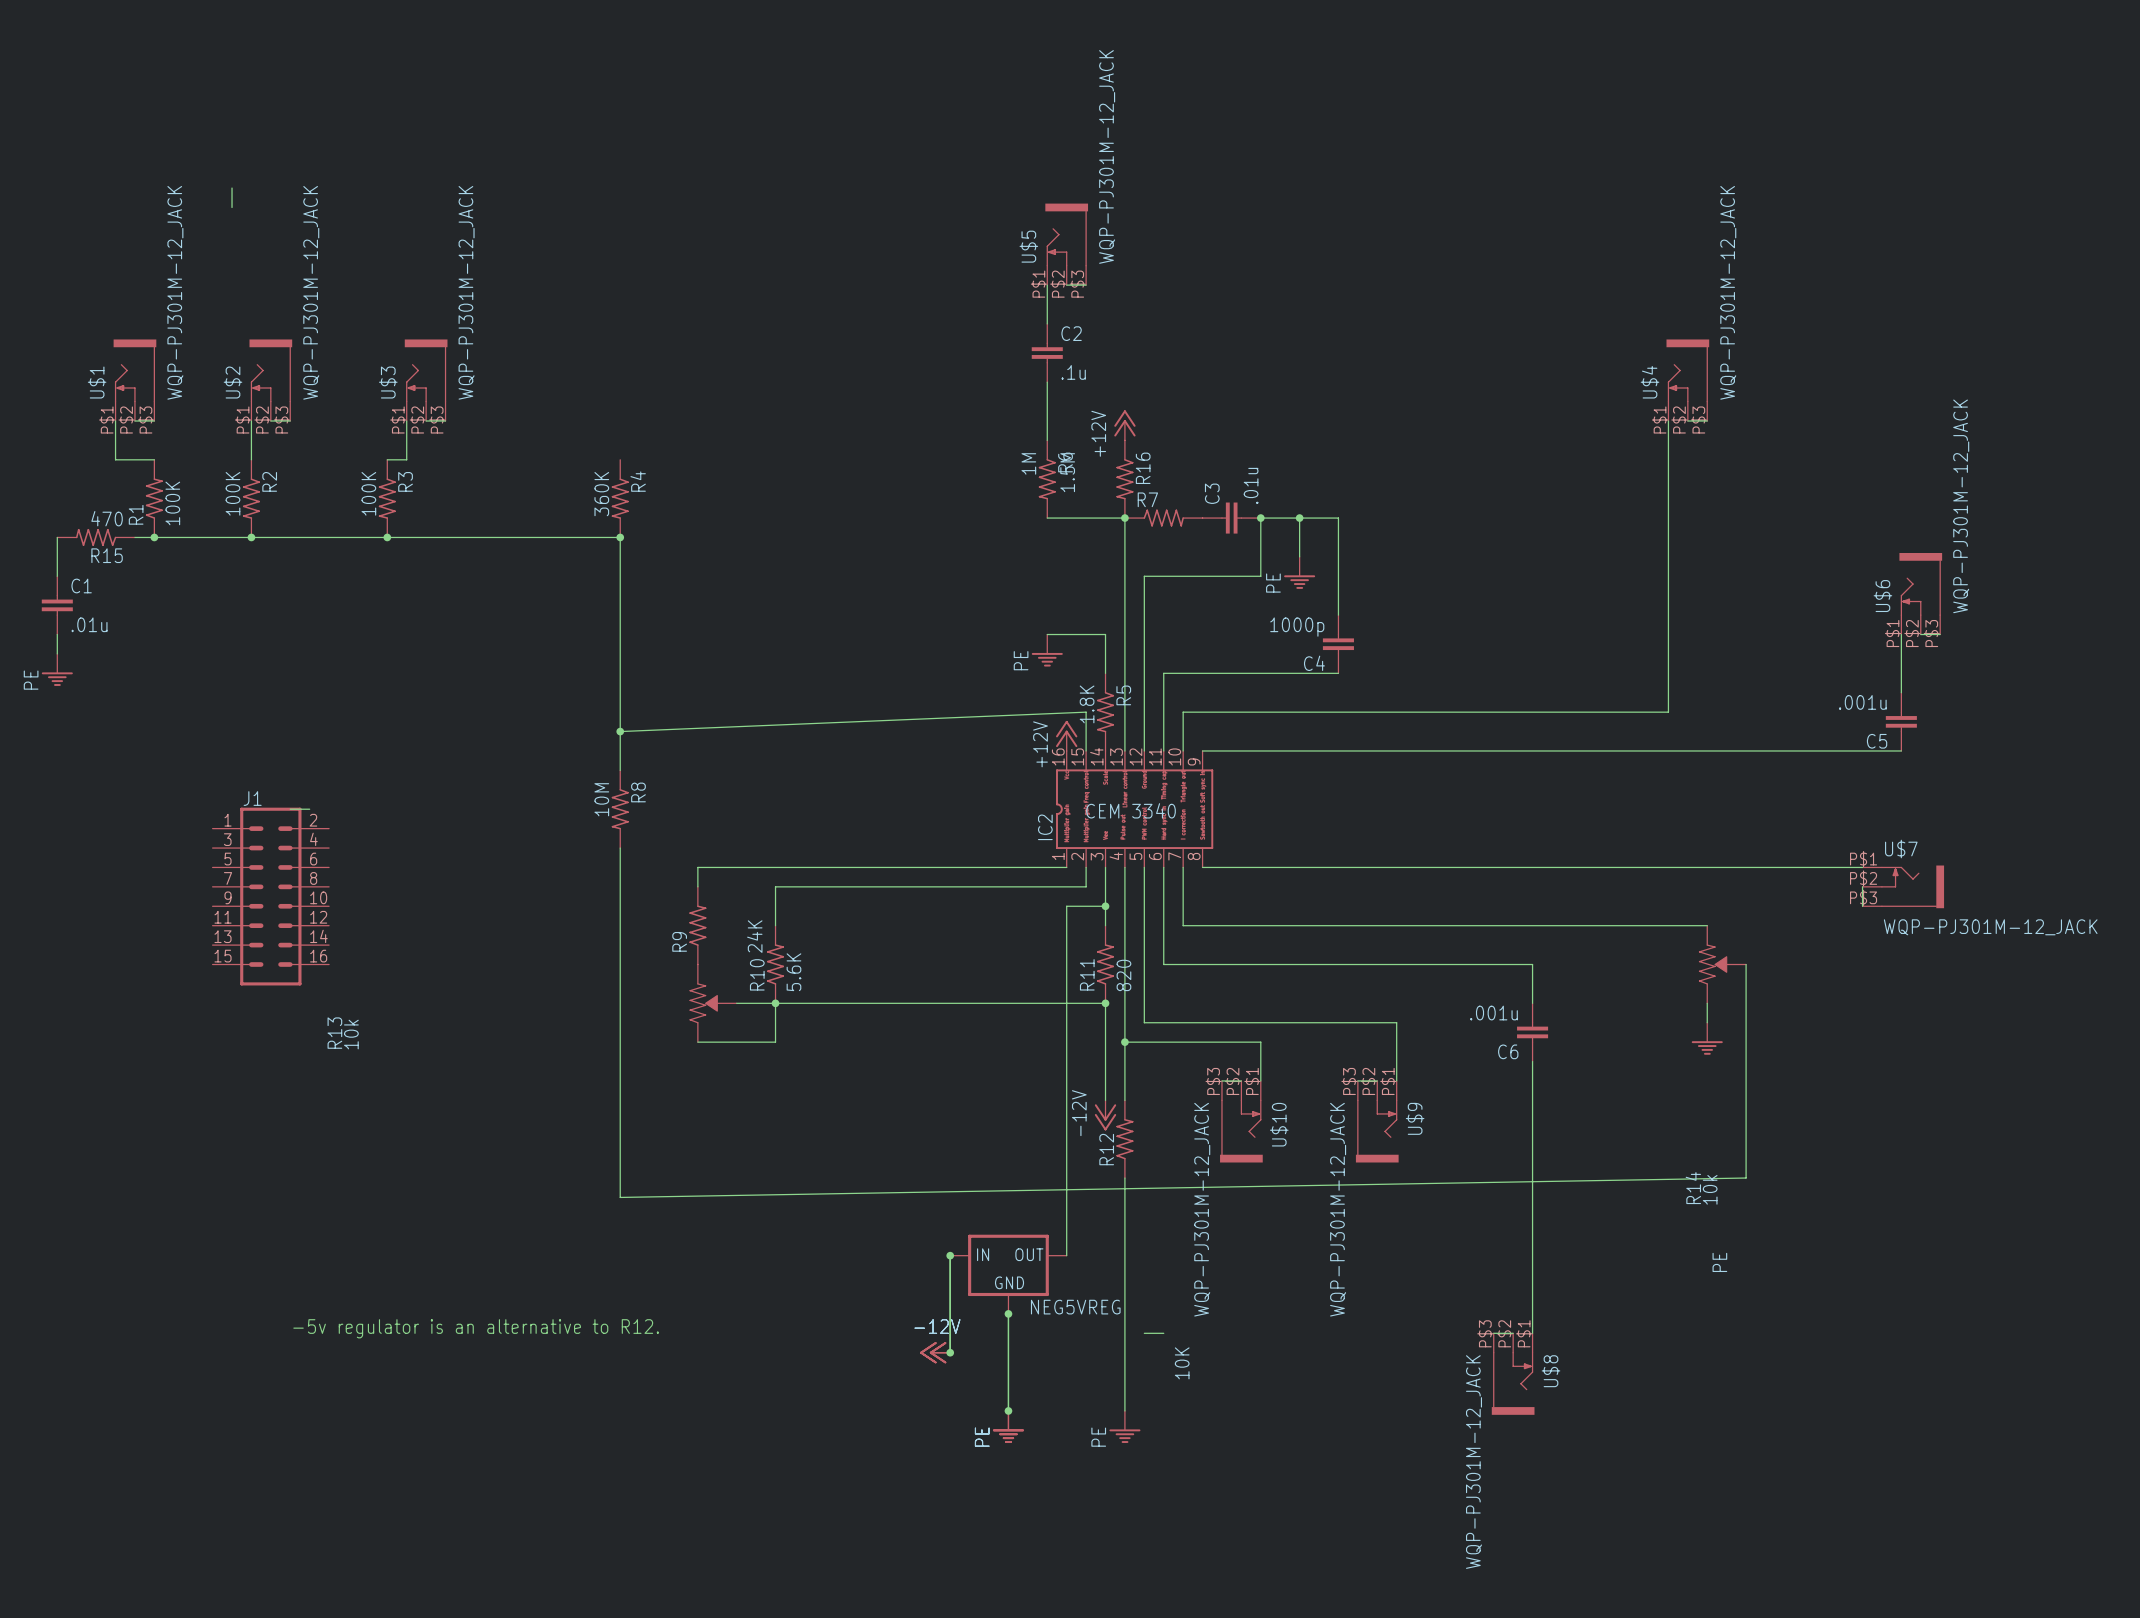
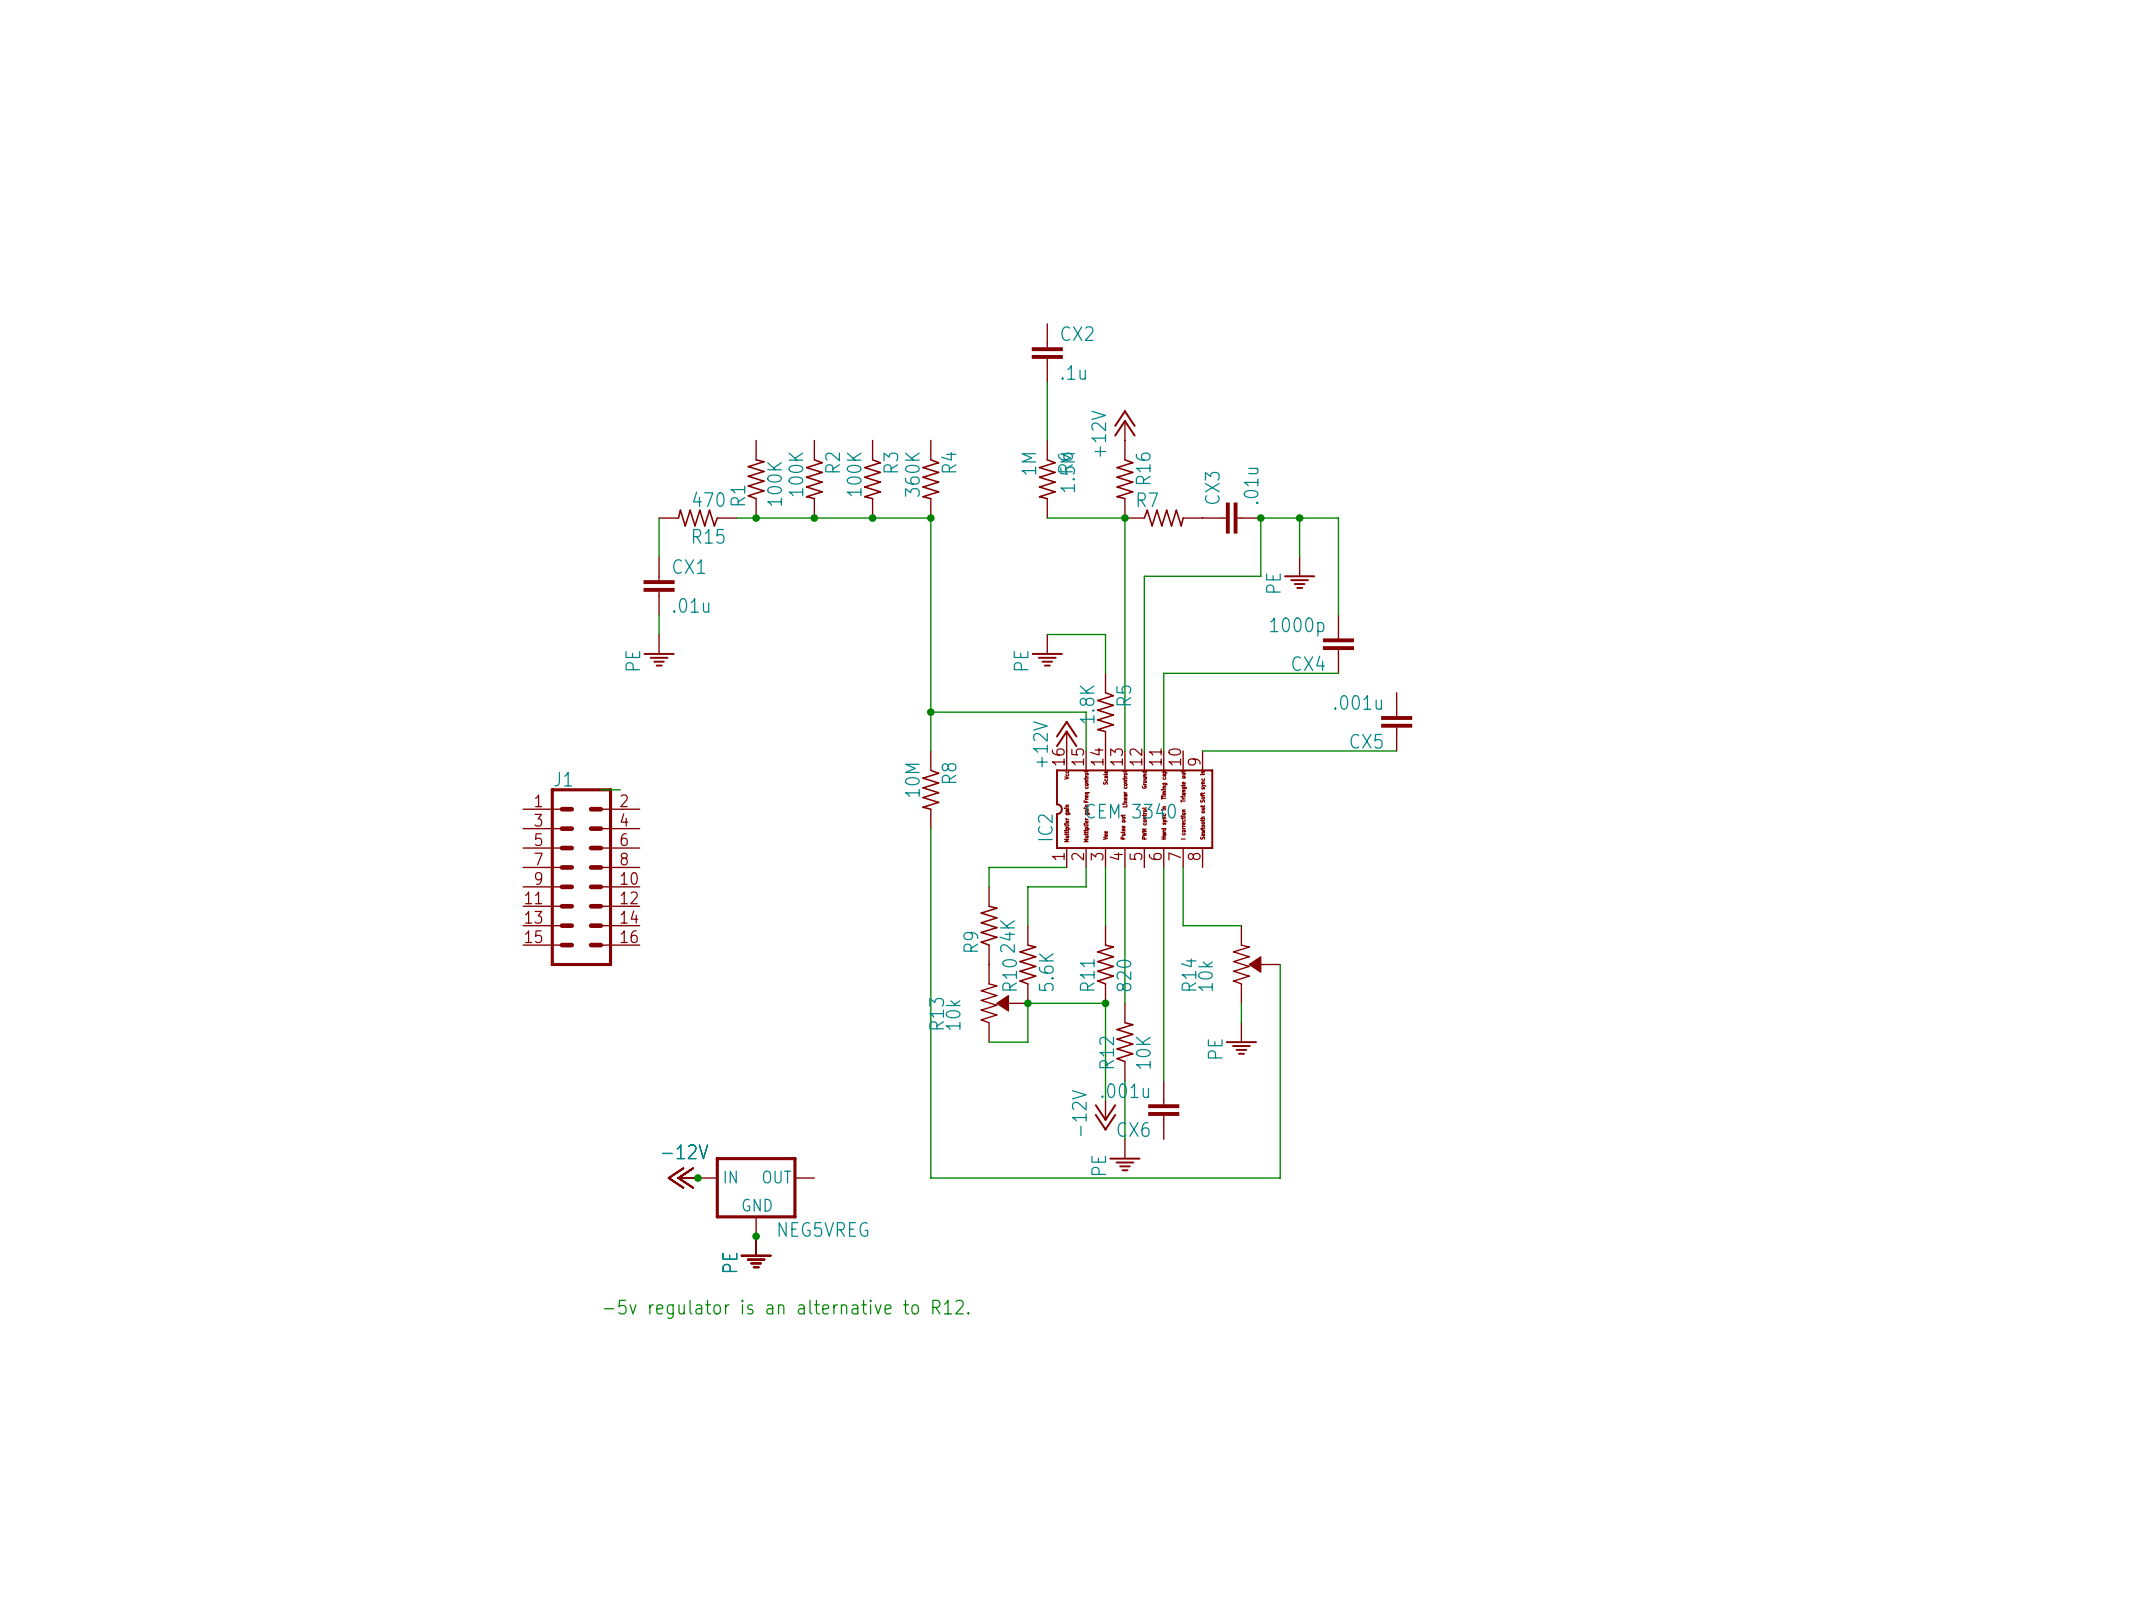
wire: (232, 188) (232, 207) -> none
U$5: WQP-PJ301M-12_JACK (1066, 244) -> none
wire: (1047, 285) (1047, 323) -> none
wire: (1066, 285) (1086, 285) -> none
C2 name: C2 (1071, 333) -> CX2 (1077, 333)
U$1: WQP-PJ301M-12_JACK (134, 380) -> none
U$2: WQP-PJ301M-12_JACK (270, 380) -> none
U$3: WQP-PJ301M-12_JACK (426, 380) -> none
U$4: WQP-PJ301M-12_JACK (1687, 380) -> none
wire: (115, 420) (115, 459) (154, 459) -> none
wire: (134, 420) (154, 420) -> none
wire: (251, 420) (251, 459) -> none
wire: (270, 420) (290, 420) -> none
wire: (406, 420) (406, 459) (387, 459) -> none
wire: (426, 420) (445, 420) -> none
wire: (1668, 420) (1668, 712) (1183, 712) (1183, 750) -> none
wire: (1687, 420) (1707, 420) -> none
C3 name: C3 (1212, 493) -> CX3 (1212, 487)
R1 position: (154, 498) -> (756, 479)
R2 position: (251, 498) -> (814, 479)
R3 position: (387, 498) -> (872, 479)
R4 position: (620, 498) -> (930, 479)
wire: none -> (659, 518) (659, 556)
wire: none -> (736, 518) (930, 518) (930, 750)
junction: none -> (756, 518)
junction: none -> (814, 518)
junction: none -> (872, 518)
junction: none -> (930, 518)
wire: (57, 537) (57, 576) -> none
R15 position: (96, 537) -> (697, 518)
wire: (134, 537) (620, 537) (620, 770) -> none
junction: (154, 537) -> none
junction: (251, 537) -> none
junction: (387, 537) -> none
junction: (620, 537) -> none
CX1: none -> .01u (659, 585)
U$6: WQP-PJ301M-12_JACK (1920, 593) -> none
C1: .01u (57, 605) -> none
wire: none -> (659, 615) (659, 634)
wire: (57, 634) (57, 653) -> none
wire: (1901, 634) (1901, 692) -> none
wire: (1920, 634) (1940, 634) -> none
power symbol: none -> PE (659, 650)
C4 name: C4 (1314, 663) -> CX4 (1308, 663)
power symbol: PE (57, 669) -> none
junction: none -> (930, 712)
wire: (1086, 712) (620, 731) -> (1086, 712) (930, 712)
CX5: none -> .001u (1396, 721)
C5: .001u (1901, 721) -> none
junction: (620, 731) -> none
wire: (1396, 750) (1901, 750) -> none
wire: none -> (600, 789) (620, 789)
wire: (290, 809) (309, 809) -> none
R8 position: (620, 809) -> (930, 789)
wire: none -> (930, 828) (930, 1178) (1280, 1178) (1280, 964)
wire: (620, 848) (620, 1197) (1746, 1178) (1746, 964) -> none
wire: (989, 867) (697, 867) (697, 886) -> (989, 867) (989, 886)
wire: (1144, 867) (1144, 1022) (1396, 1022) (1396, 1080) -> none
wire: (1202, 867) (1862, 867) -> none
wire: (1027, 886) (775, 886) (775, 925) -> (1027, 886) (1027, 925)
wire: (1862, 886) (1862, 906) -> none
U$7: WQP-PJ301M-12_JACK (1903, 886) -> none
J1 position: (270, 896) -> (581, 877)
wire: (1105, 906) (1066, 906) (1066, 1255) -> none
junction: (1105, 906) -> none
R9 position: (697, 925) -> (989, 925)
wire: (1241, 925) (1707, 925) -> none
R9 value position: 24K (754, 936) -> 24K (1007, 936)
R10 position: (775, 964) -> (1027, 964)
wire: (1163, 964) (1532, 964) (1532, 1003) -> (1163, 964) (1163, 1080)
R14 position: (1722, 964) -> (1256, 964)
R13 position: (713, 1003) -> (1004, 1003)
wire: (736, 1003) (1027, 1003) -> (989, 1042) (1027, 1042) (1027, 1003)
wire: (775, 1003) (775, 1042) (697, 1042) -> none
junction: (775, 1003) -> none
junction: none -> (1027, 1003)
wire: none -> (1241, 1003) (1241, 1022)
wire: (1707, 1003) (1707, 1022) -> none
C6: .001u (1532, 1032) -> none
R13 name position: R13 (334, 1033) -> R13 (936, 1013)
R13 value position: 10k (351, 1034) -> 10k (953, 1015)
power symbol: none -> PE (1241, 1038)
power symbol: PE (1707, 1038) -> none
wire: (1124, 1042) (1260, 1042) (1260, 1080) -> none
junction: (1124, 1042) -> none
wire: (1532, 1061) (1532, 1333) -> none
wire: (1221, 1080) (1241, 1080) -> none
wire: (1357, 1080) (1377, 1080) -> none
CX6: none -> .001u (1163, 1110)
U$10: WQP-PJ301M-12_JACK (1241, 1121) -> none
U$9: WQP-PJ301M-12_JACK (1377, 1121) -> none
R12 position: (1124, 1139) -> (1124, 1042)
power symbol: none -> PE (1124, 1155)
power symbol: none -> -12V (682, 1178)
junction: none -> (697, 1178)
wire: (1124, 1178) (1124, 1410) -> none
R14 name position: R14 (1693, 1188) -> R14 (1188, 974)
R14 value position: 10k (1710, 1189) -> 10k (1205, 976)
junction: none -> (756, 1236)
power symbol: none -> PE (756, 1252)
wire: (950, 1255) (950, 1352) -> none
junction: (950, 1255) -> none
NEG5VREG position: (1008, 1274) -> (756, 1196)
text: none -> -5v regulator is an alternative to R12. (786, 1309)
wire: (1008, 1313) (1008, 1410) -> none
junction: (1008, 1313) -> none
text: -5v regulator is an alternative to R12. (476, 1328) -> none
wire: (1144, 1333) (1163, 1333) -> none
wire: (1493, 1333) (1513, 1333) -> none
power symbol: -12V (935, 1352) -> none
junction: (950, 1352) -> none
R12 value position: 10K (1182, 1363) -> 10K (1143, 1052)
U$8: WQP-PJ301M-12_JACK (1513, 1374) -> none
junction: (1008, 1410) -> none
power symbol: PE (1008, 1426) -> none
power symbol: PE (1124, 1426) -> none

